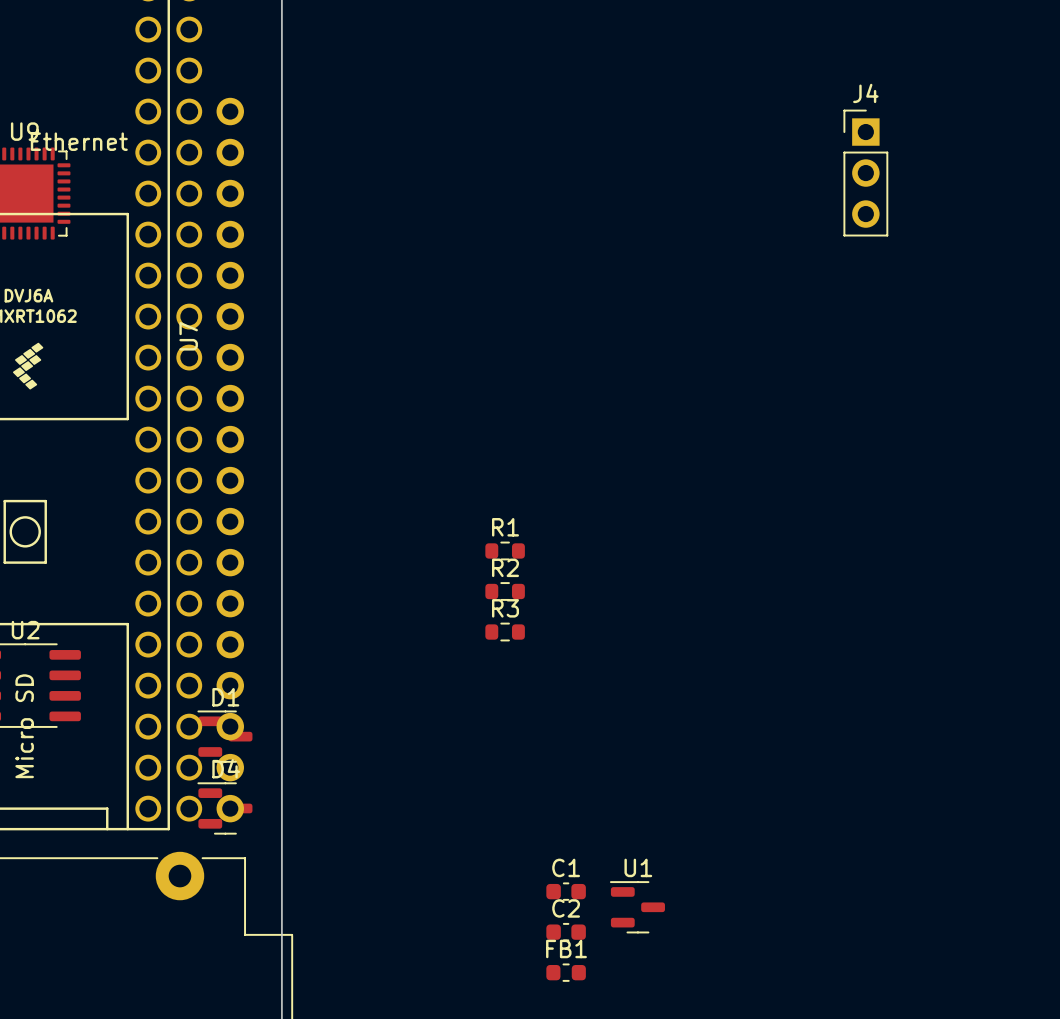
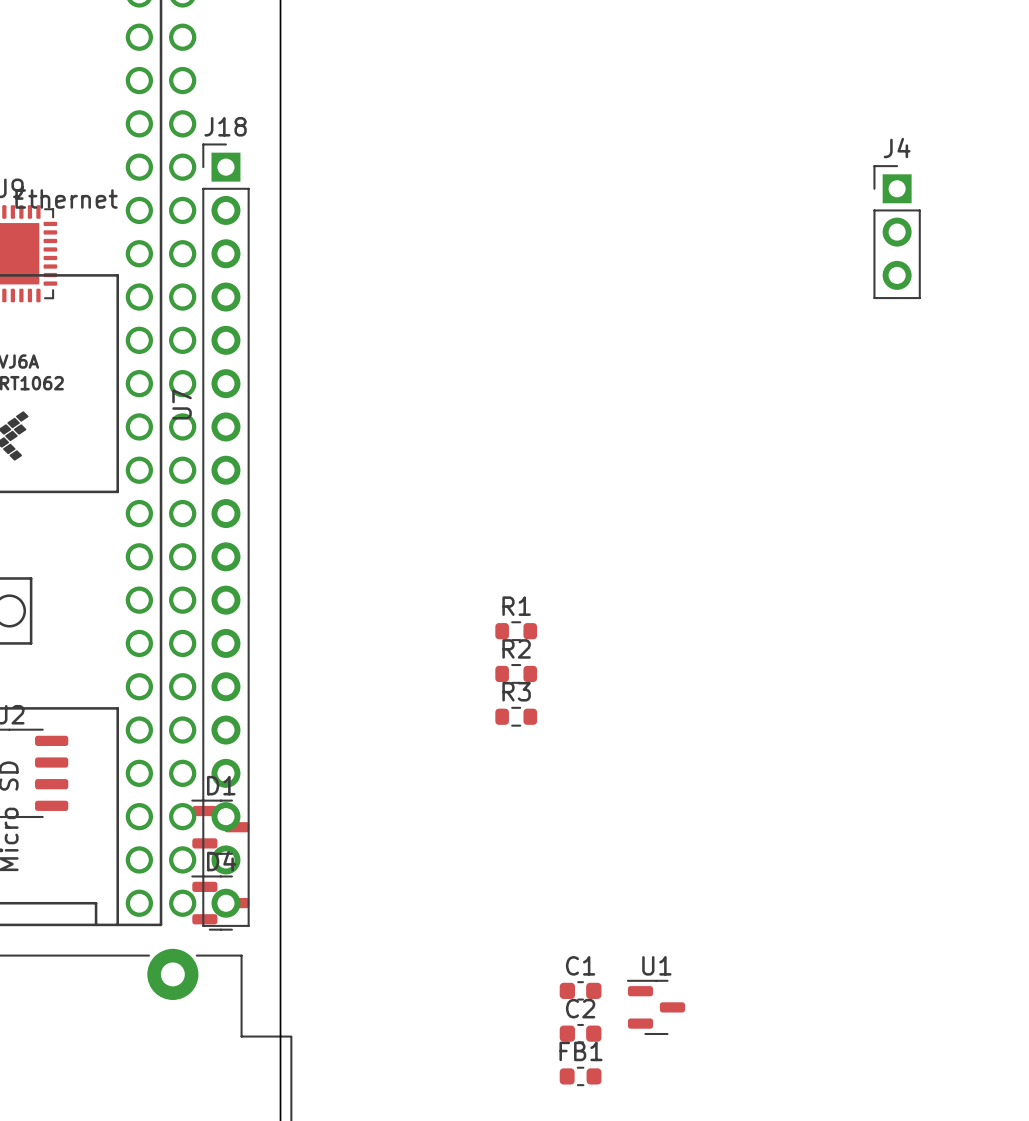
part: (230, 460) -> none
J18: none -> (225, 535)

